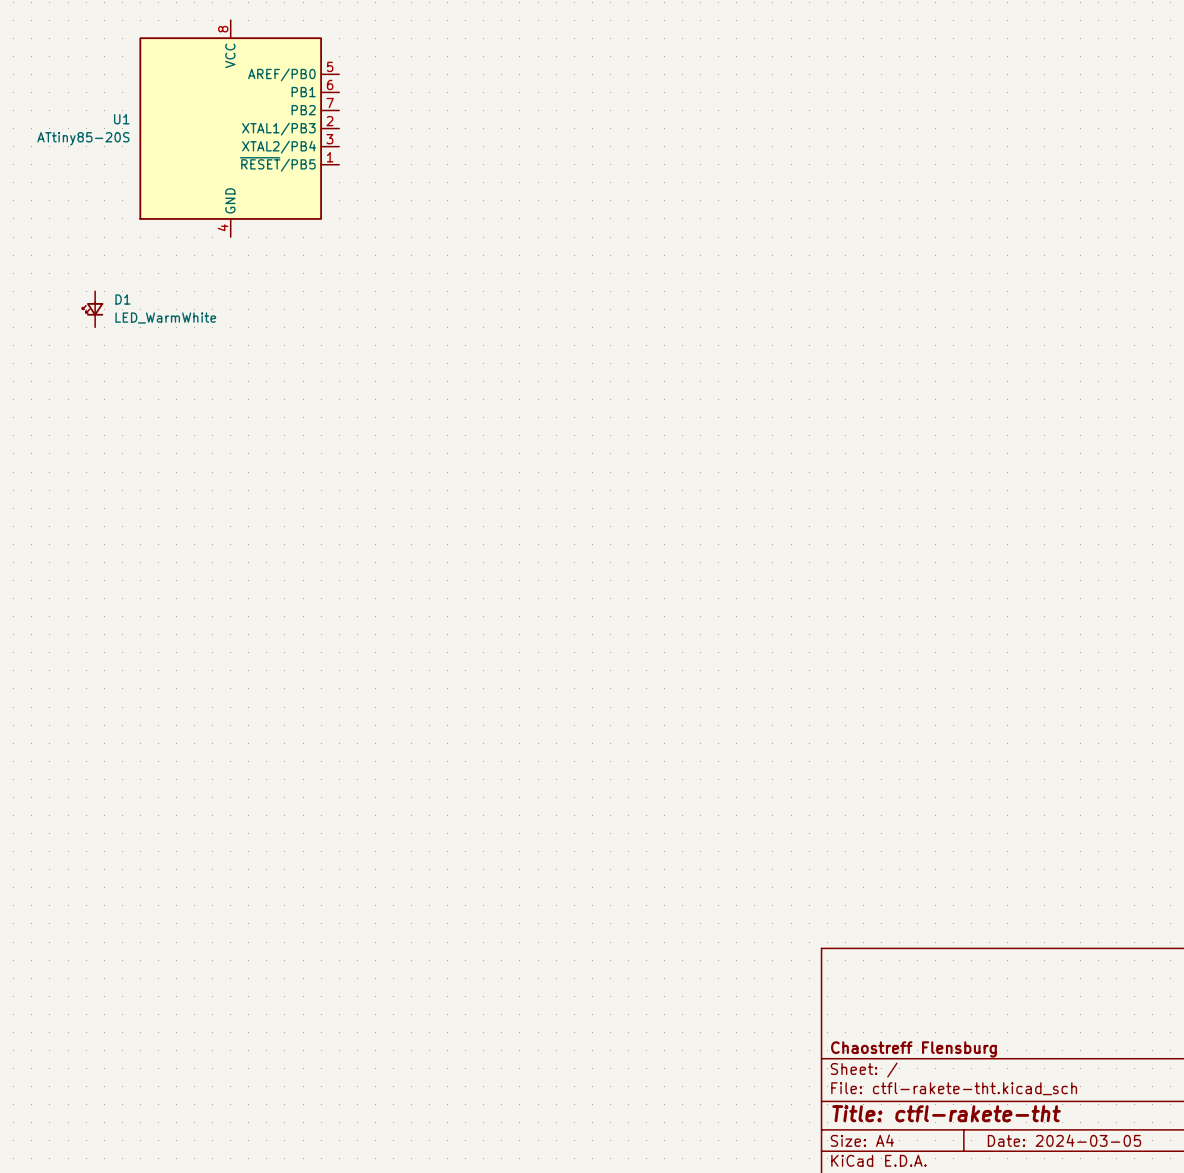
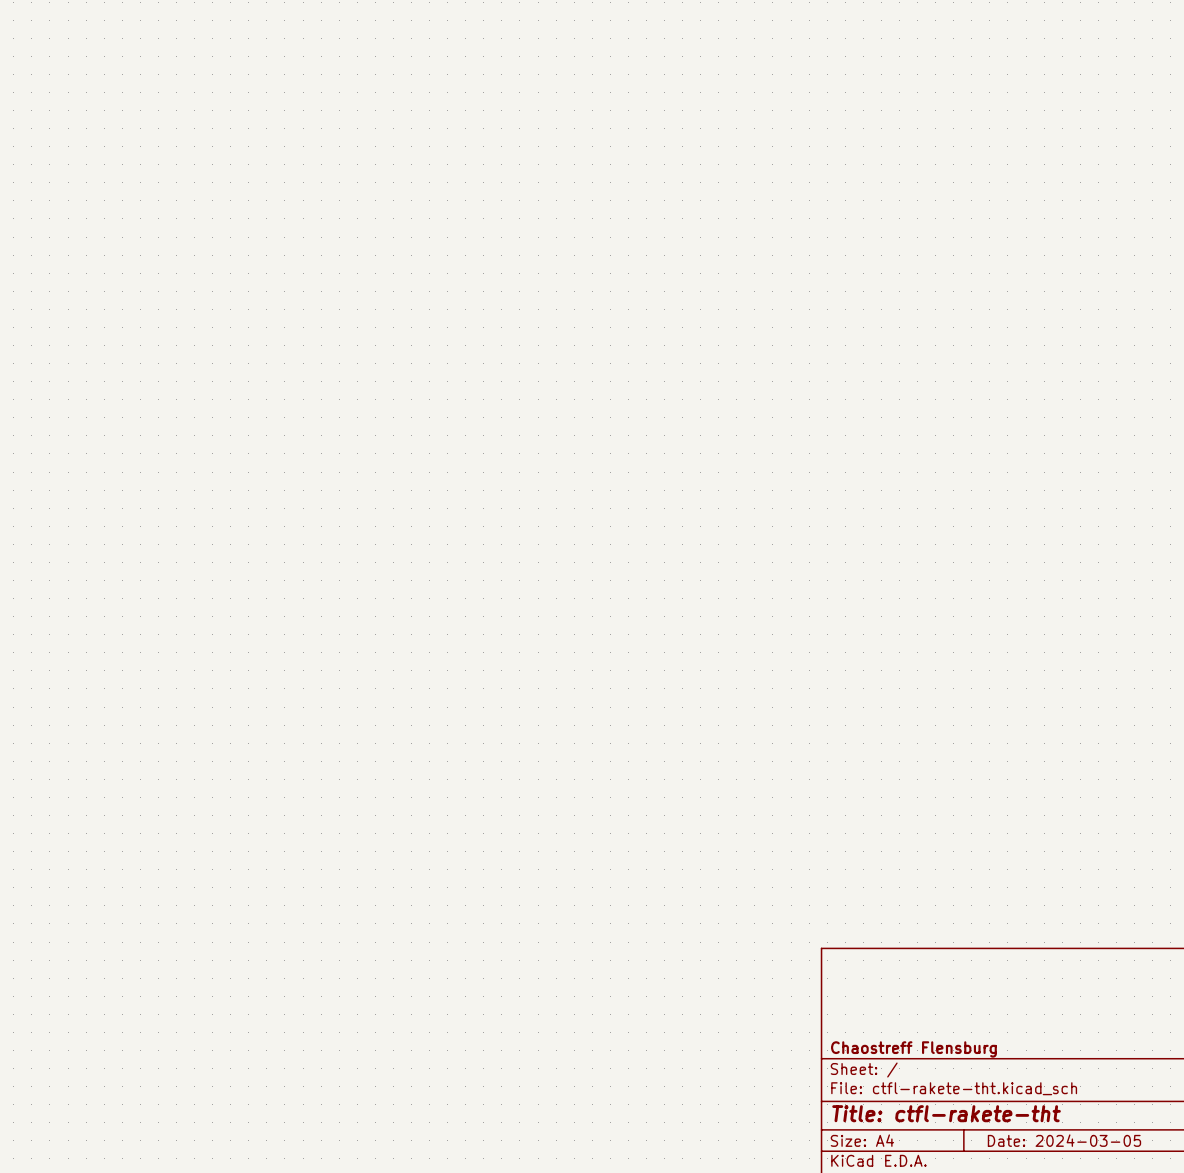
U1: ATtiny85-20S (239, 128) -> none
D1: LED_WarmWhite (92, 309) -> none

